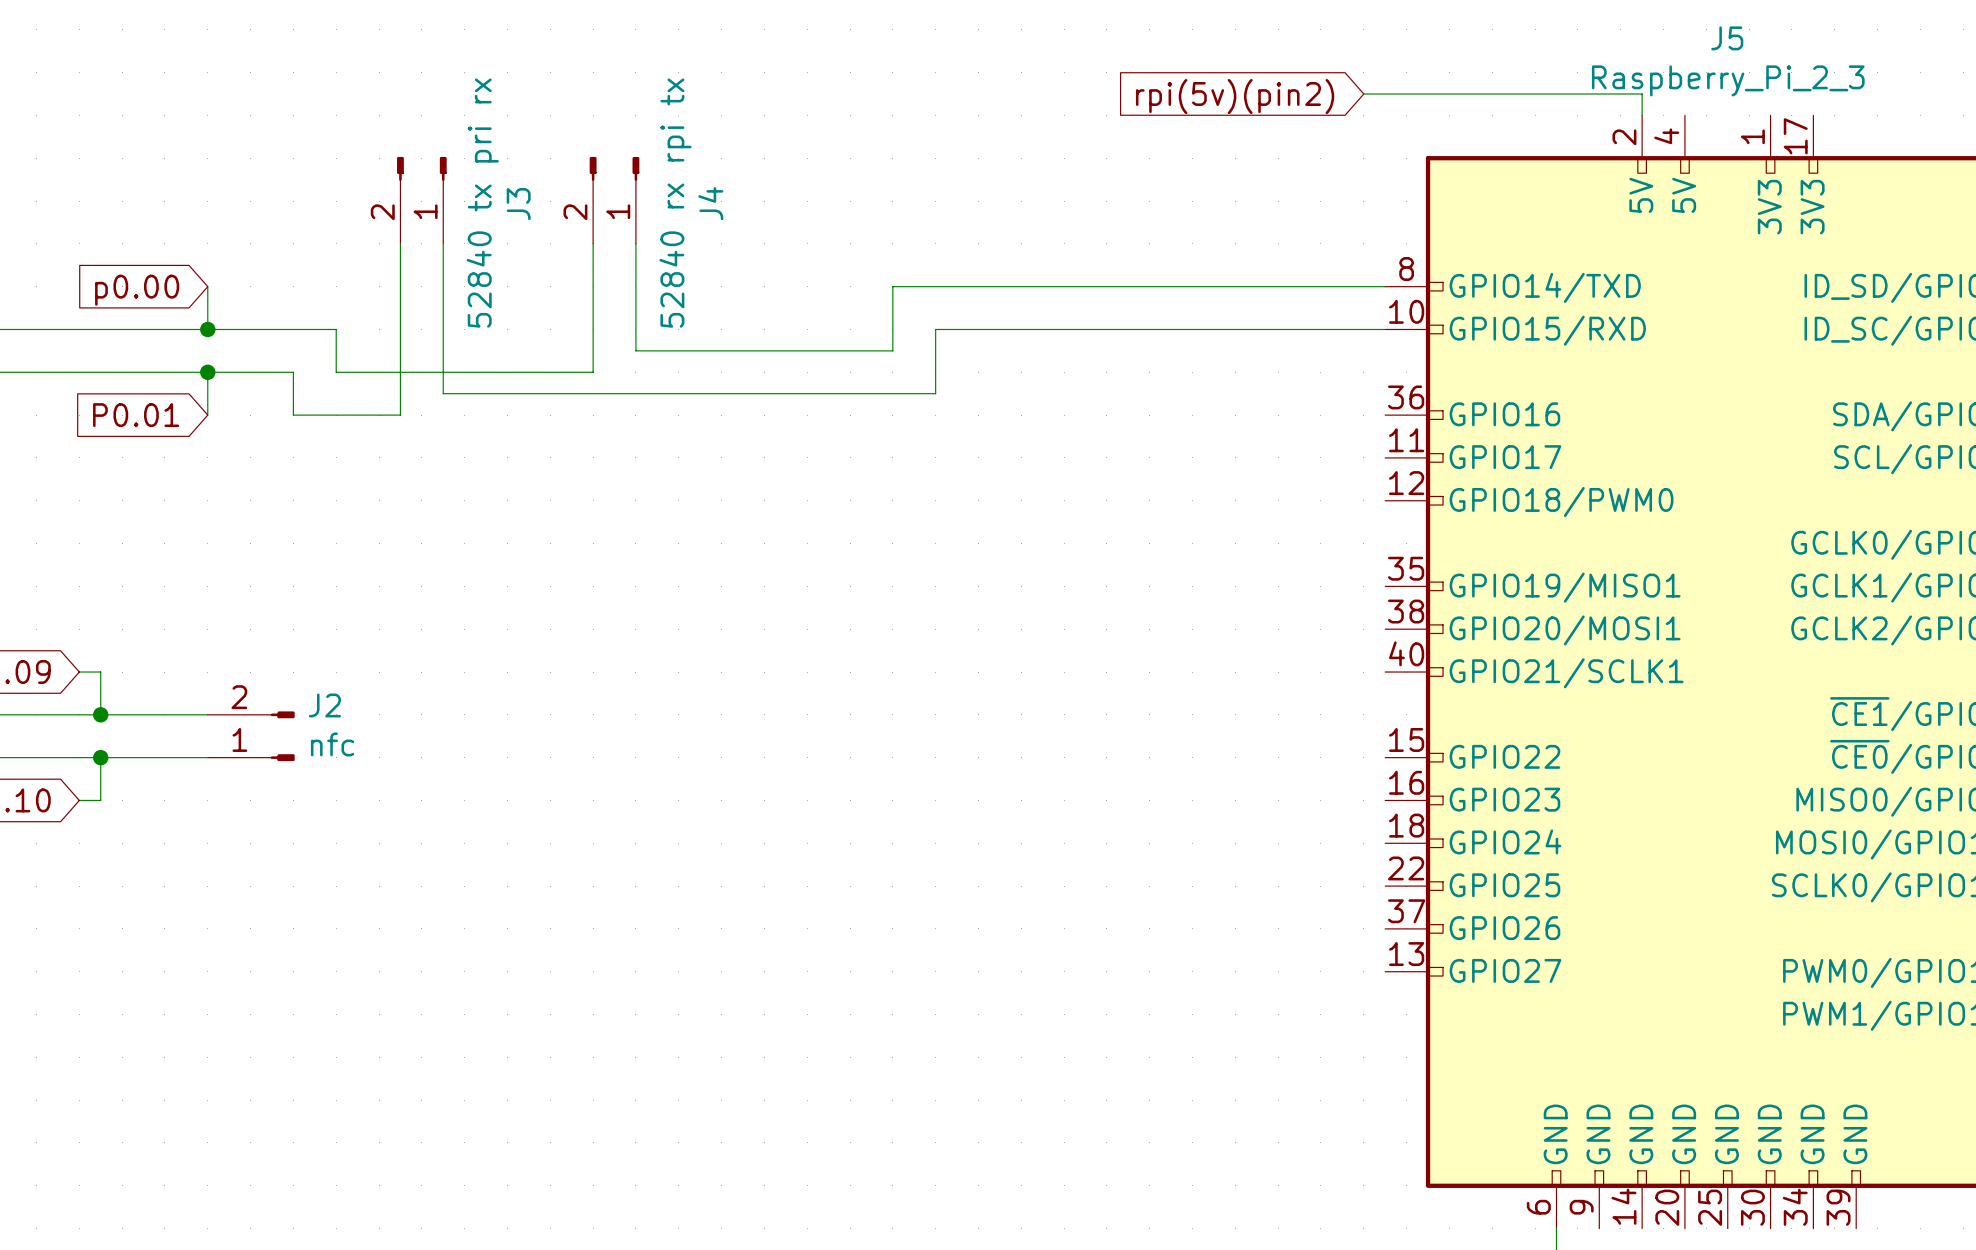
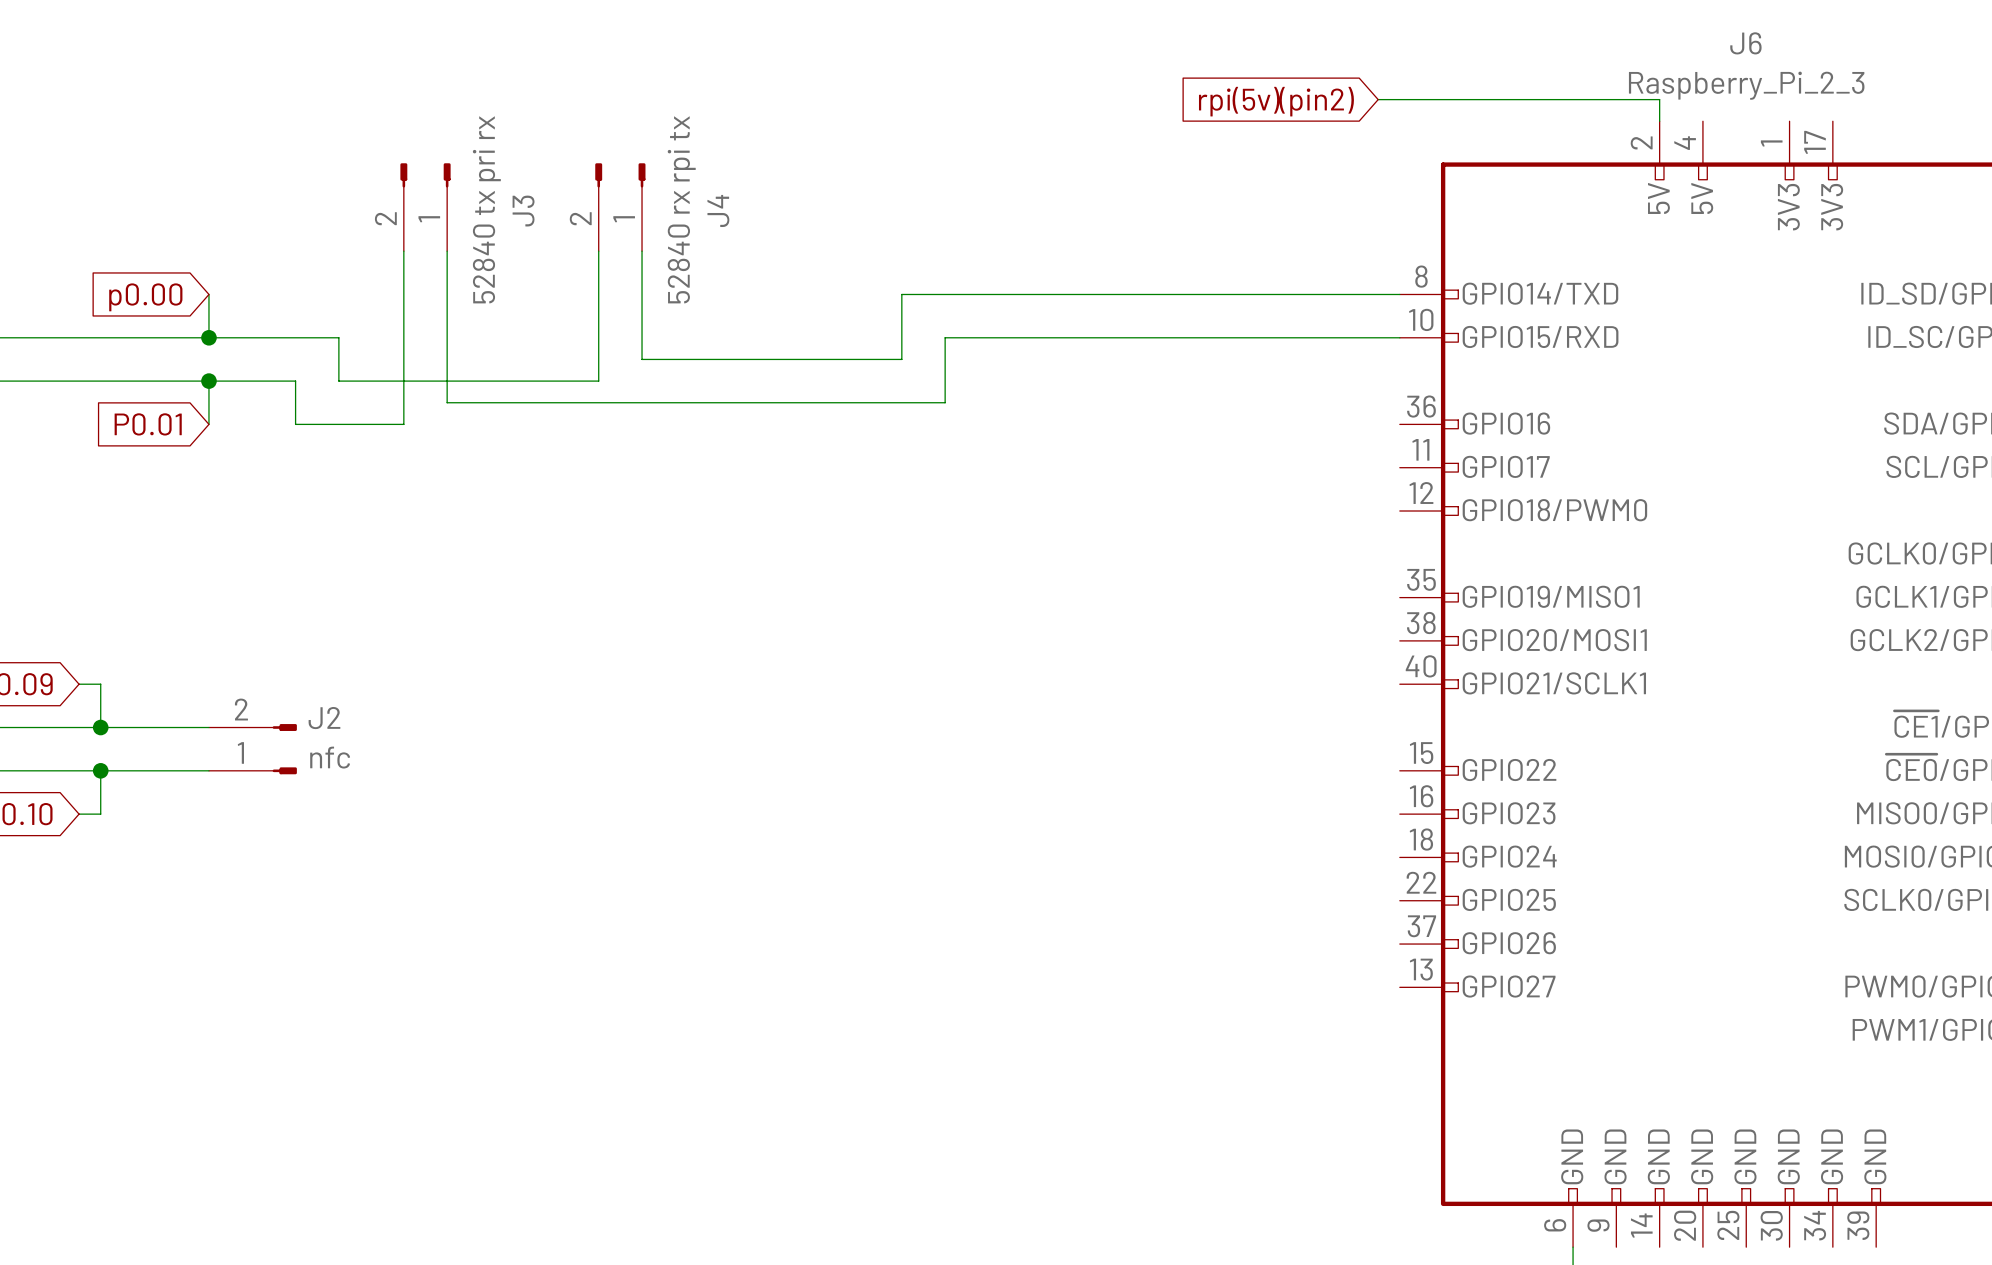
J5 name: J5 (1727, 38) -> J6 (1745, 43)

